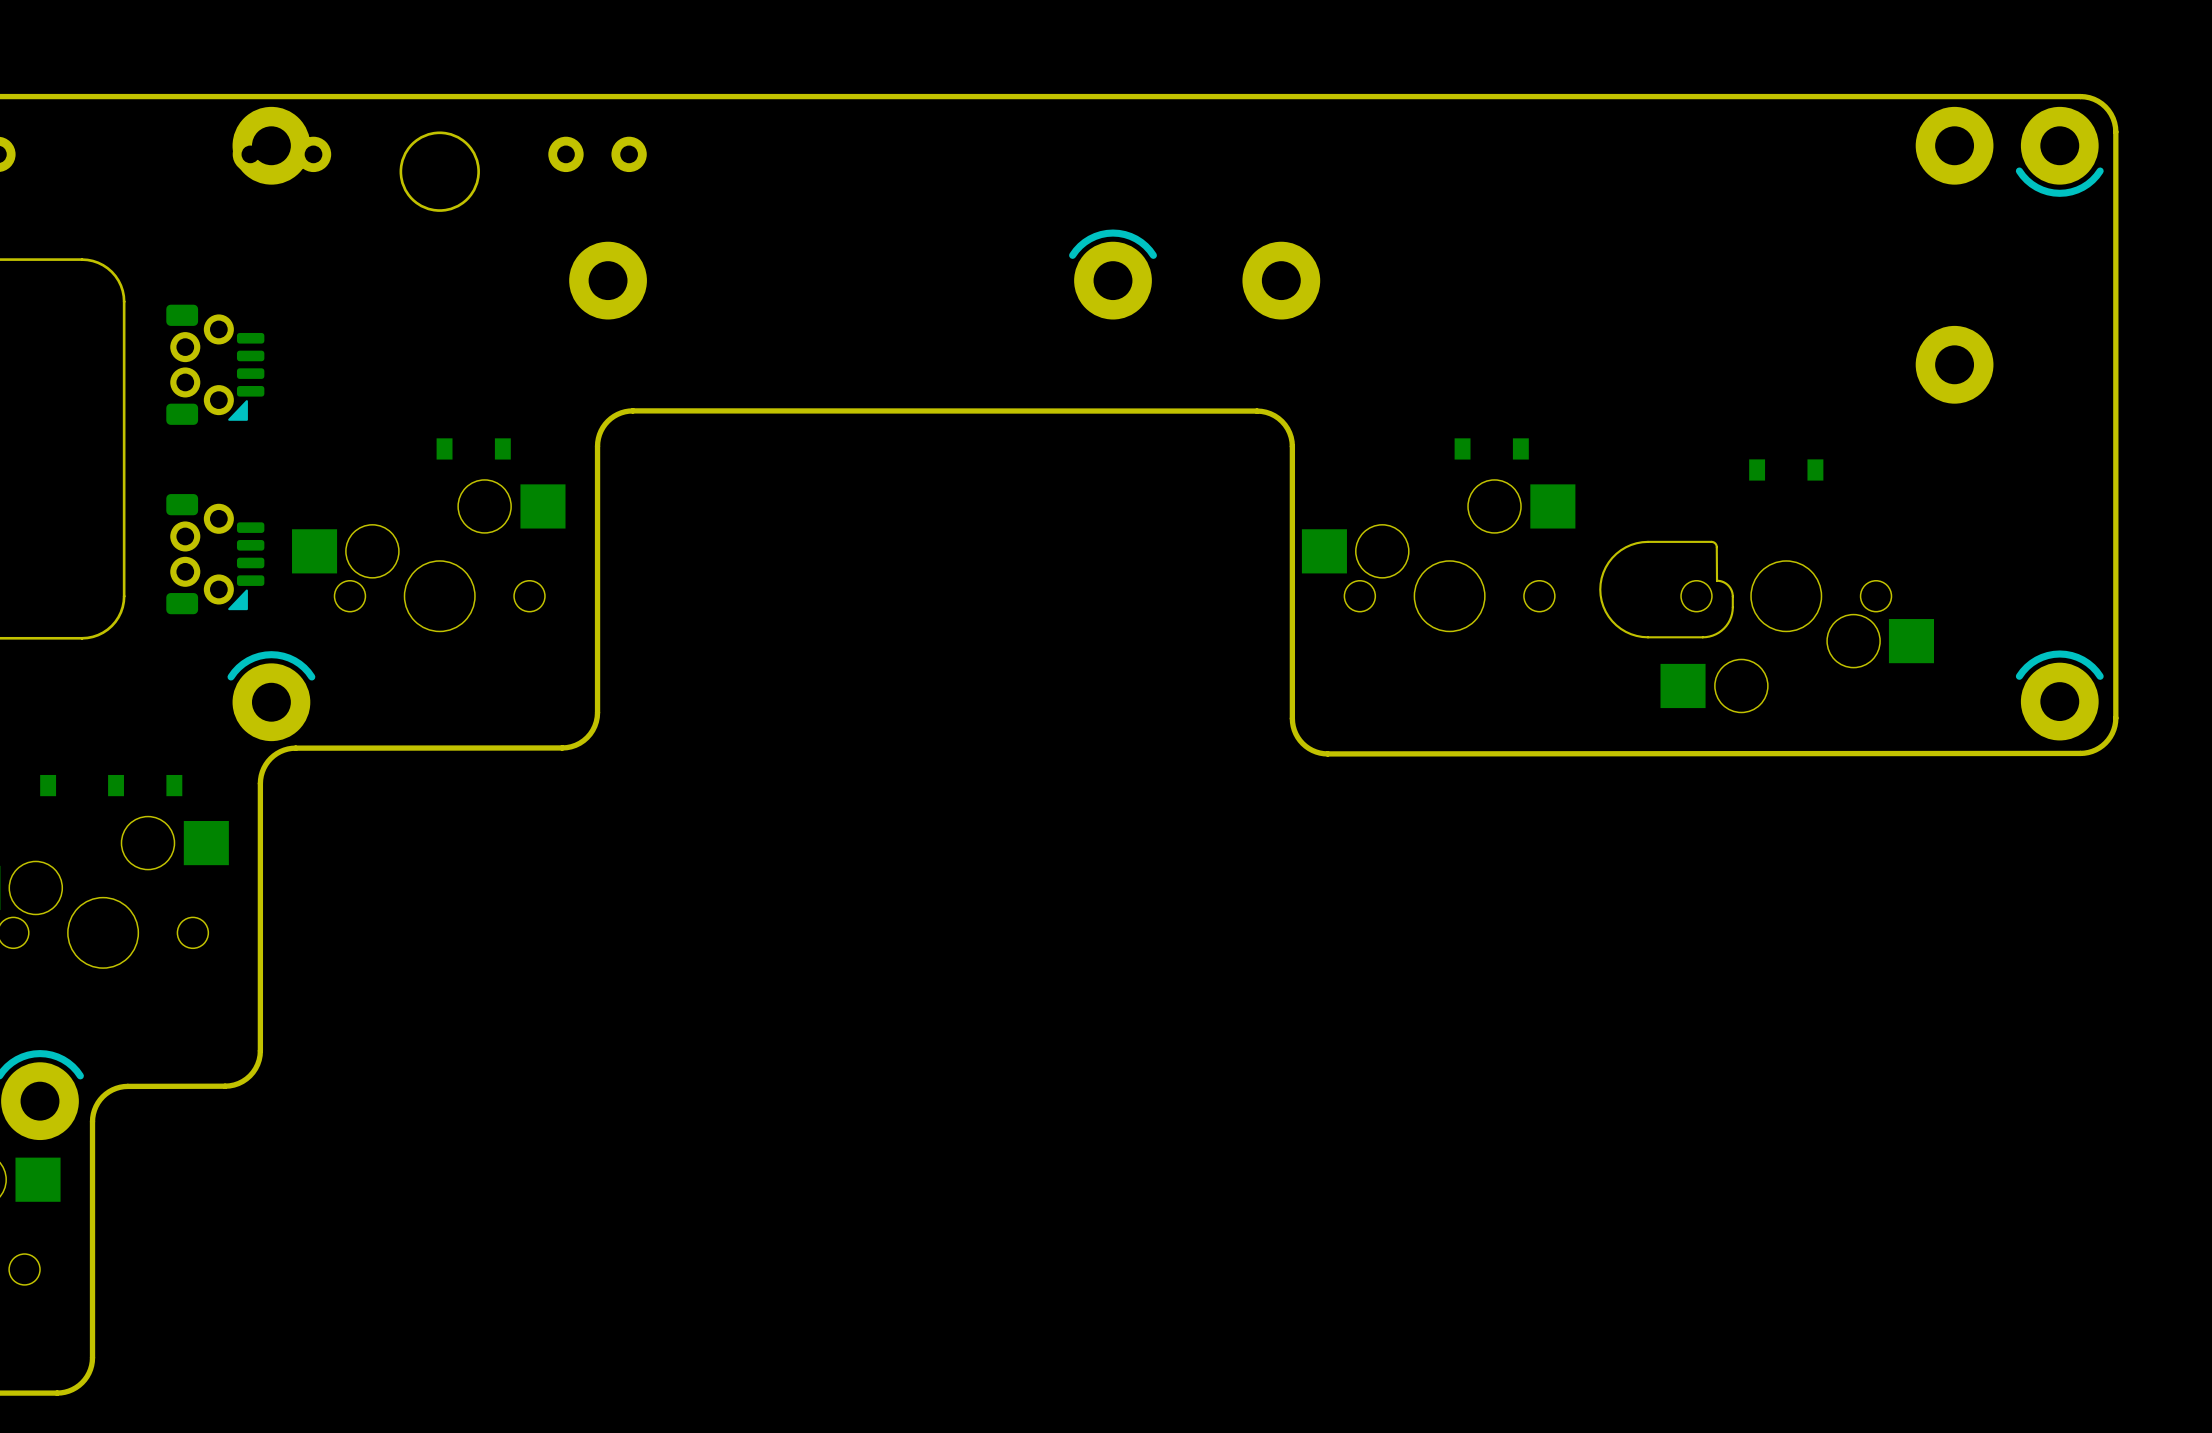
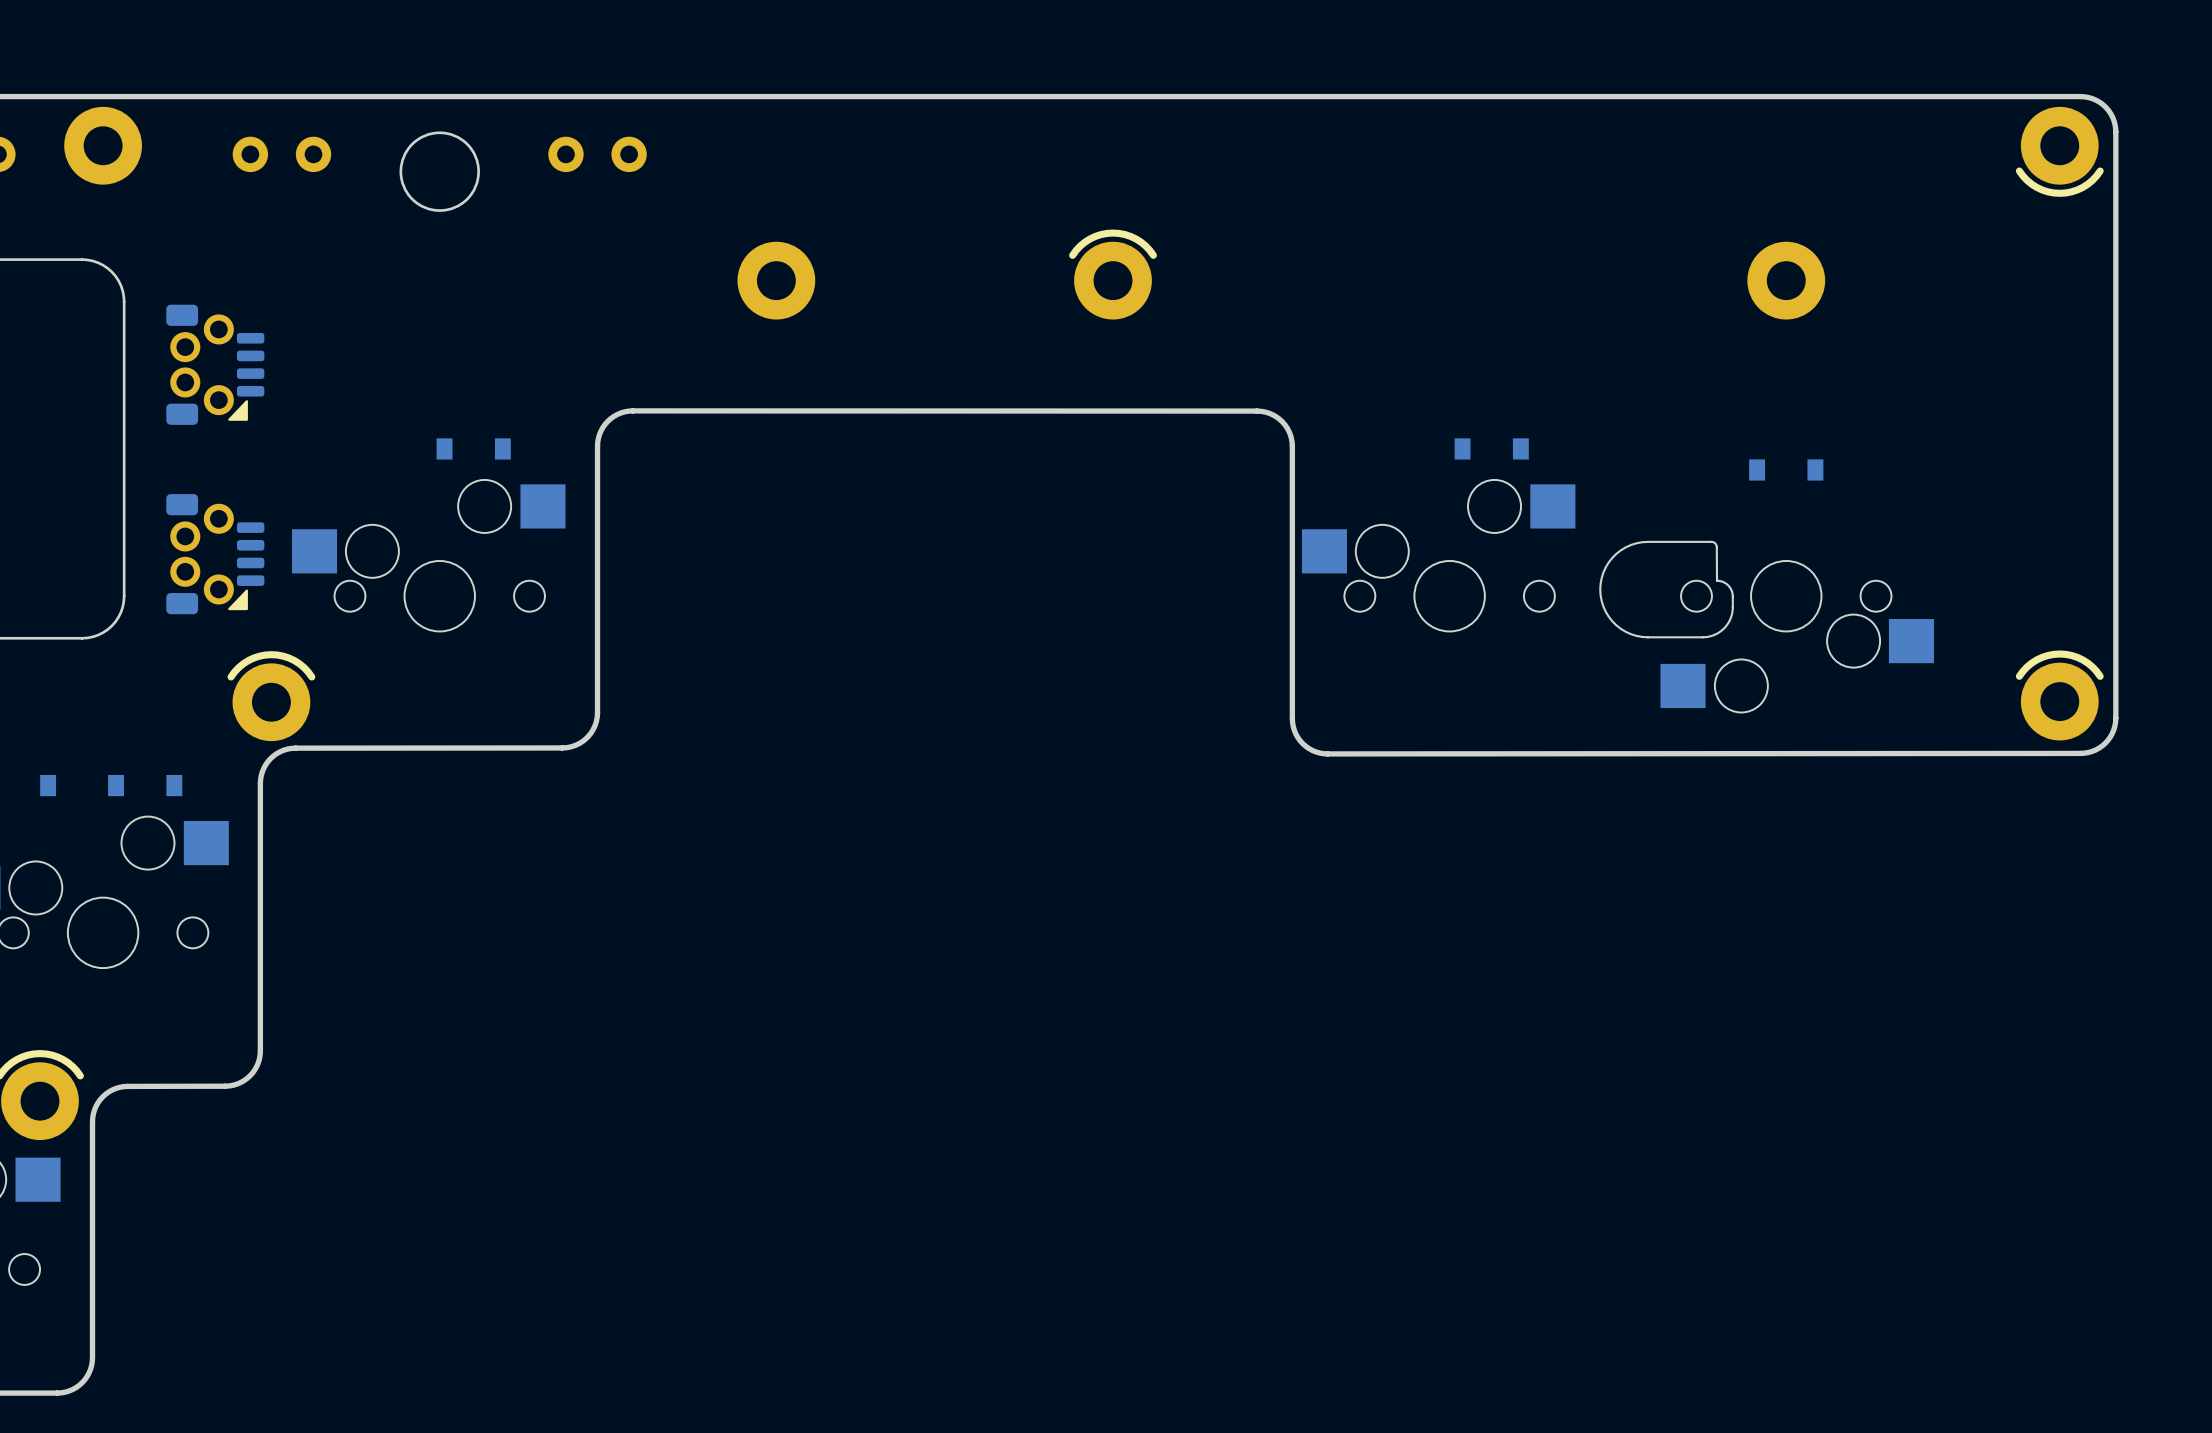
part position: (271, 145) -> (103, 145)
part: (1954, 145) -> none
part position: (608, 280) -> (776, 280)
part: (1281, 280) -> none
part: none -> (1786, 280)
part: (1954, 364) -> none

